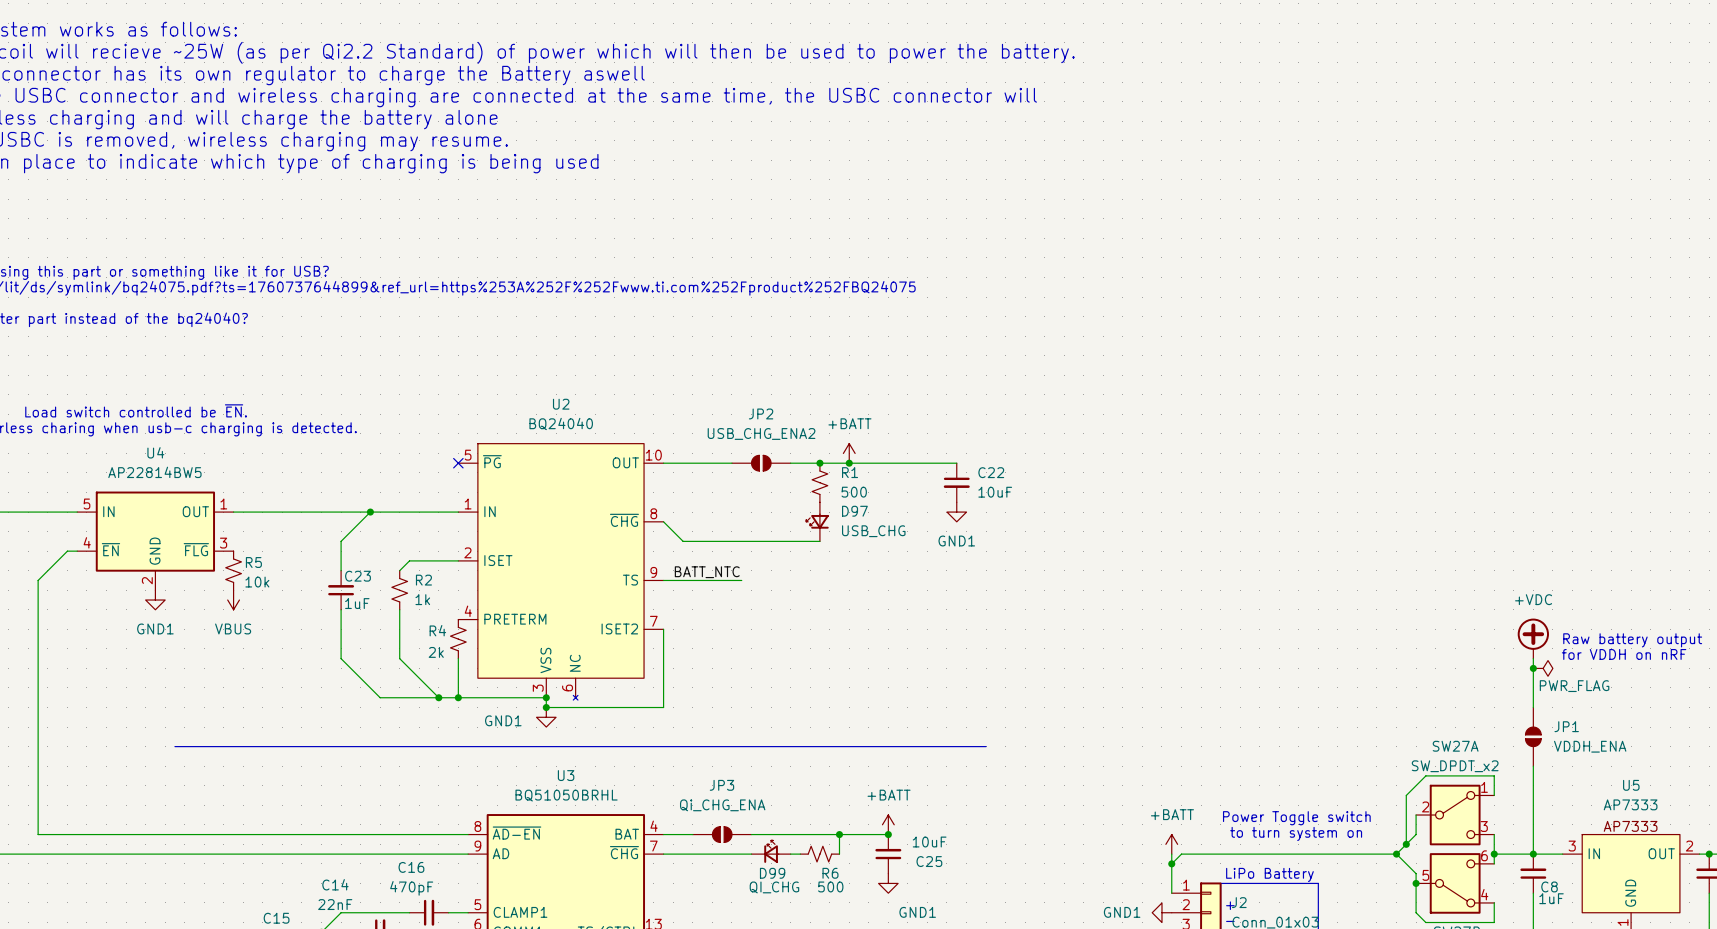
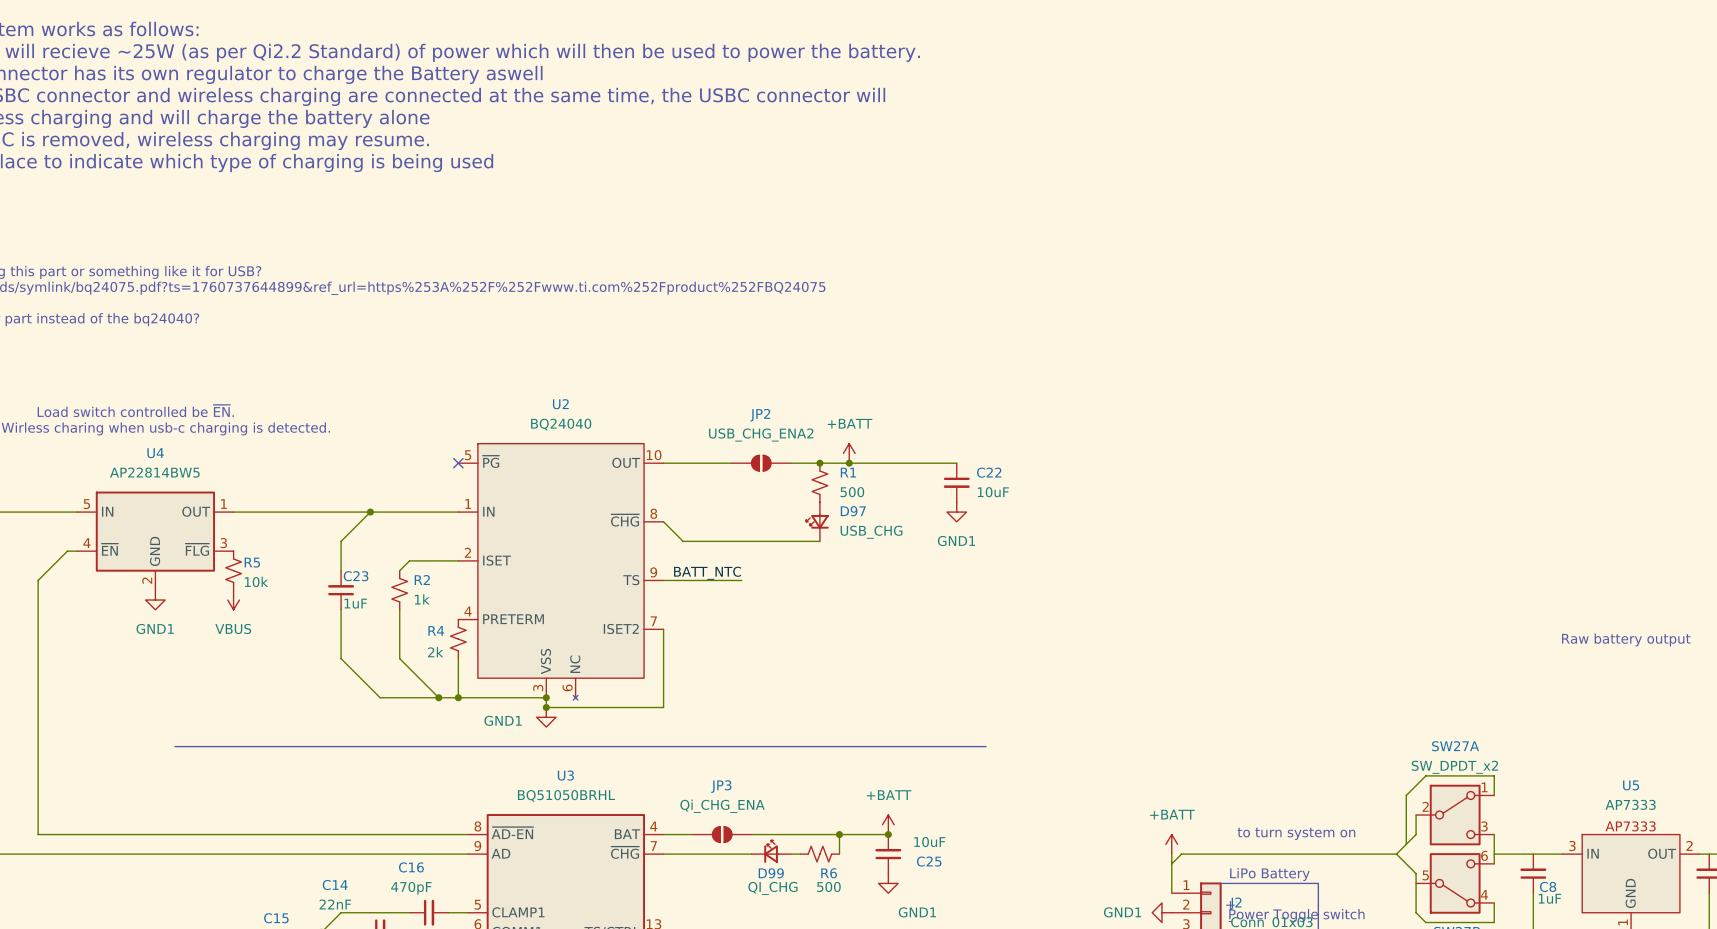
power symbol: +VDC (1533, 638) -> none
text: for VDDH on nRF (1624, 654) -> none
wire: (1533, 658) (1533, 707) -> none
junction: (1533, 668) -> none
power symbol: PWR_FLAG (1543, 668) -> none
JP1: VDDH_ENA (1533, 736) -> none
wire: (1533, 766) (1533, 854) -> none
text position: Power Toggle switch (1296, 818) -> Power Toggle switch (1296, 915)
junction: (1406, 844) -> none
junction: (1396, 854) -> none
junction: (1494, 854) -> none
junction: (1533, 854) -> none
junction: (1709, 854) -> none
junction: (1171, 863) -> none
junction: (1416, 883) -> none

